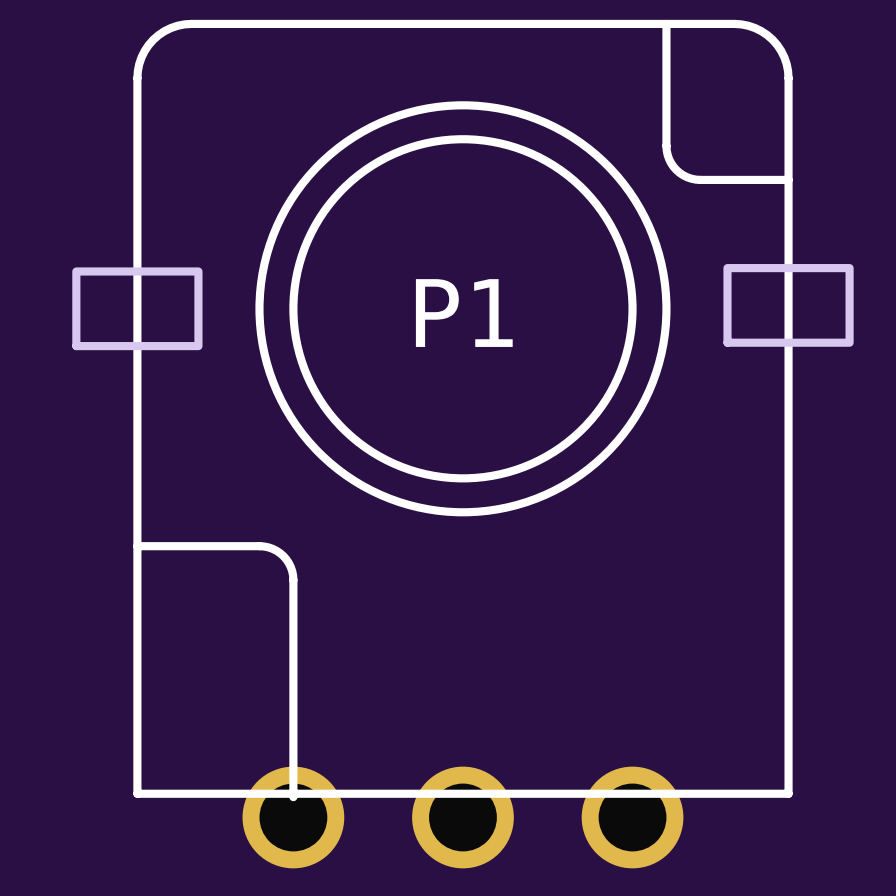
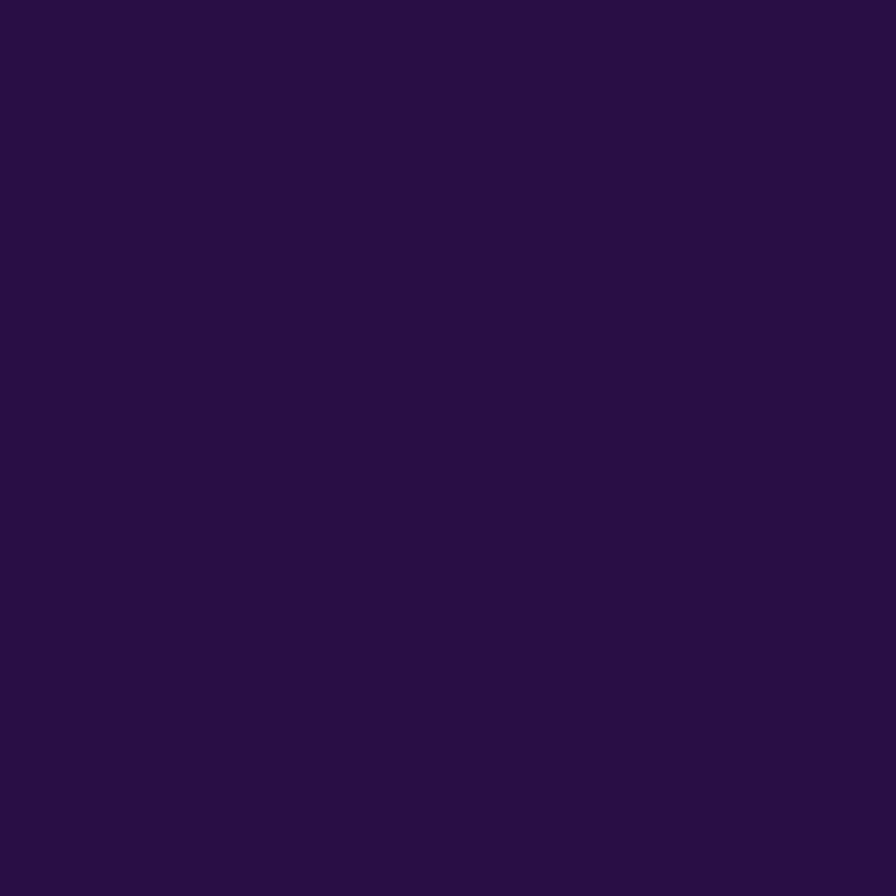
P1: (462, 444) -> none

